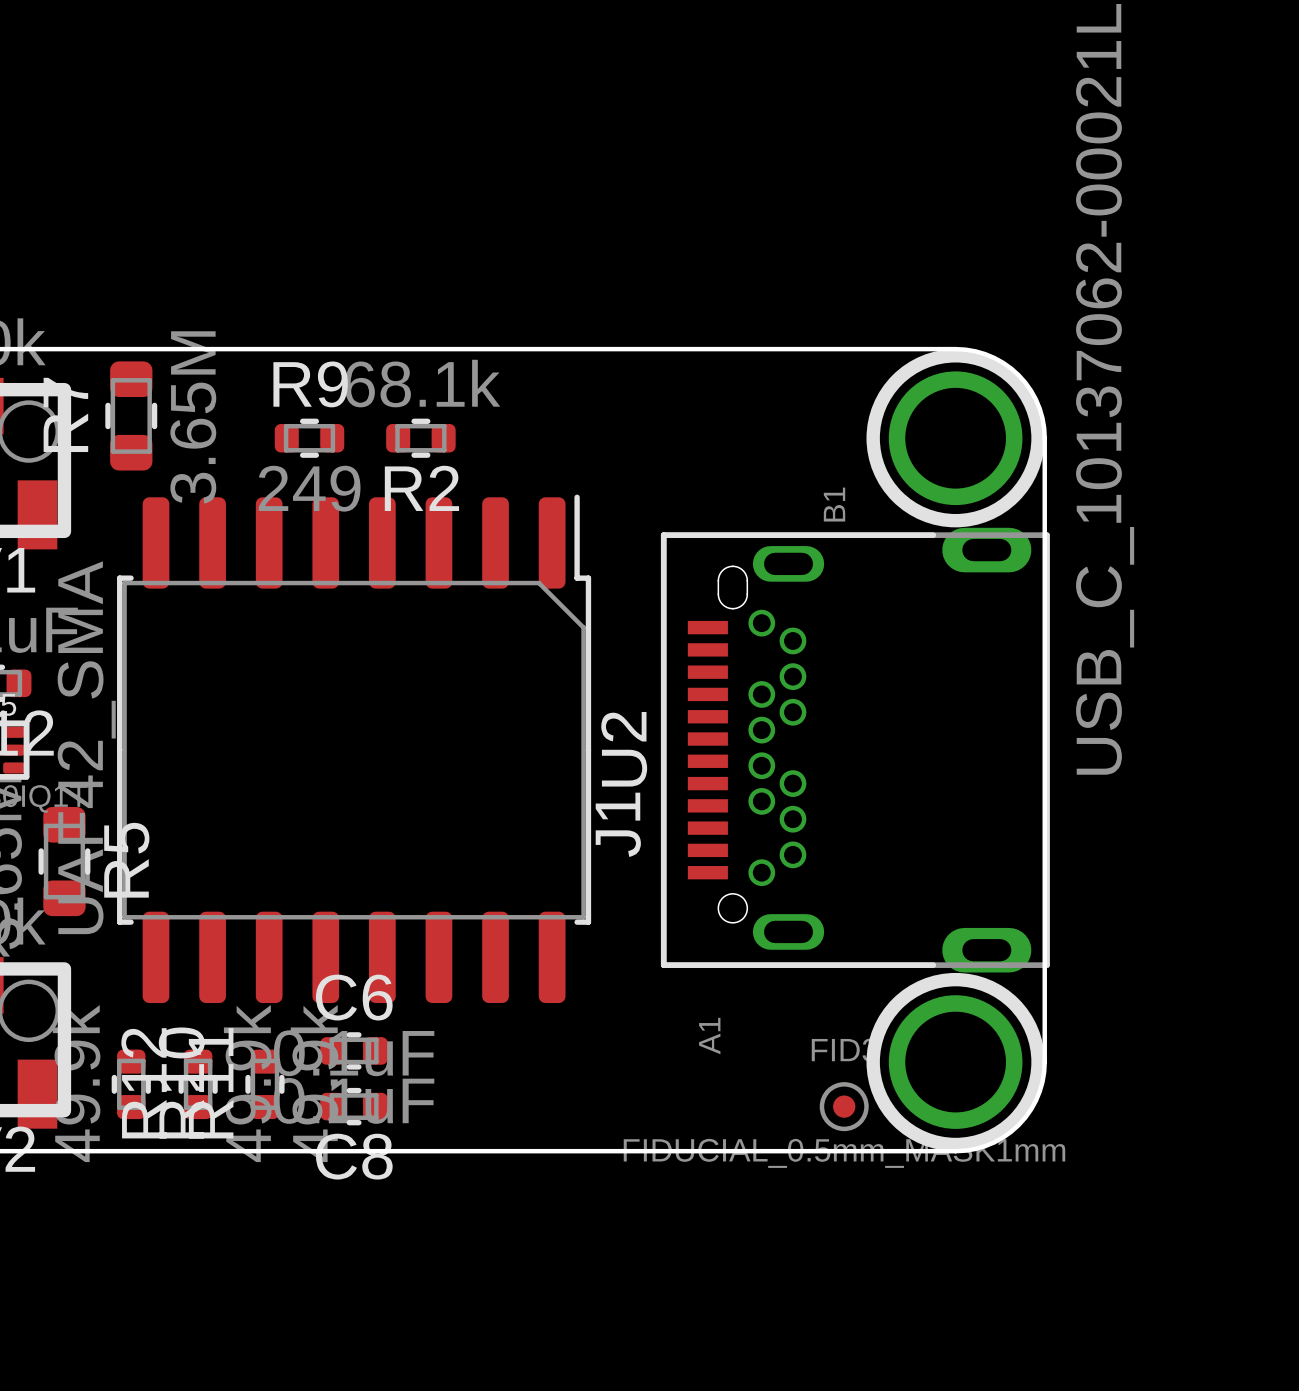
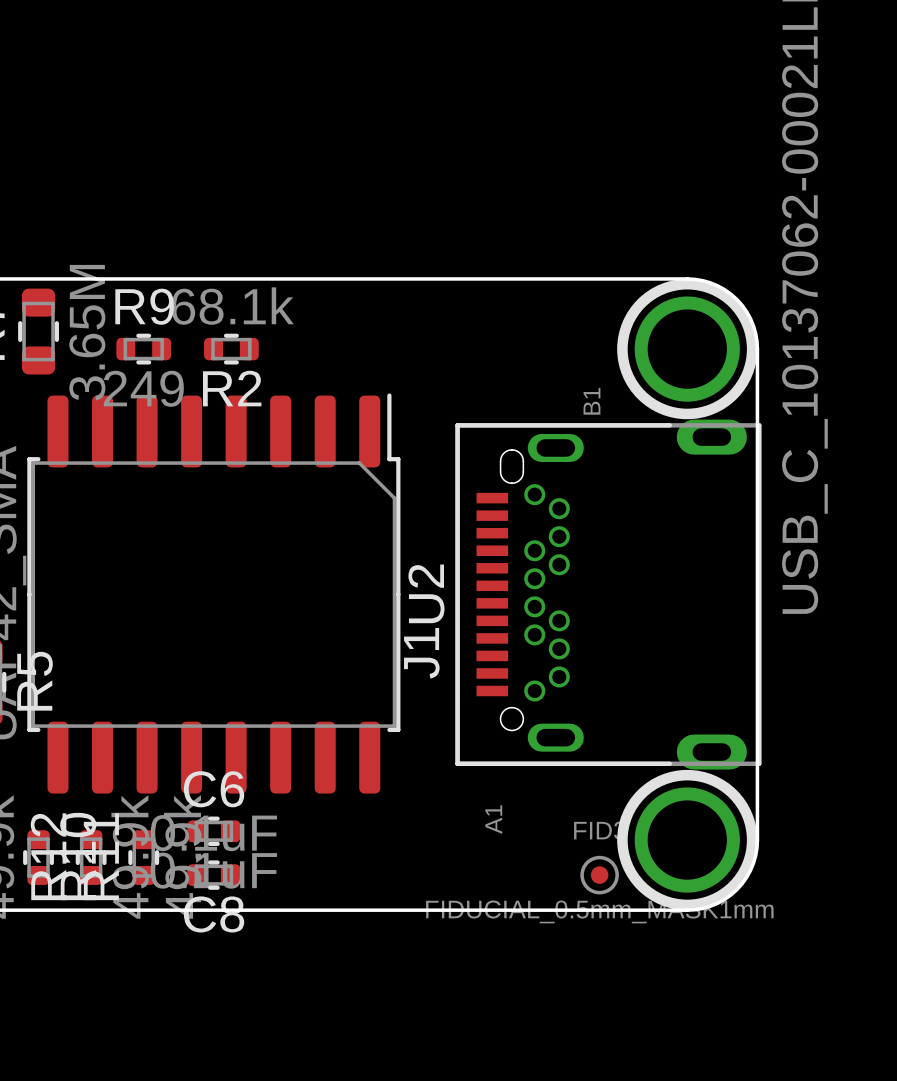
R9 position: (309, 438) -> (143, 349)
R2 position: (420, 438) -> (231, 349)

